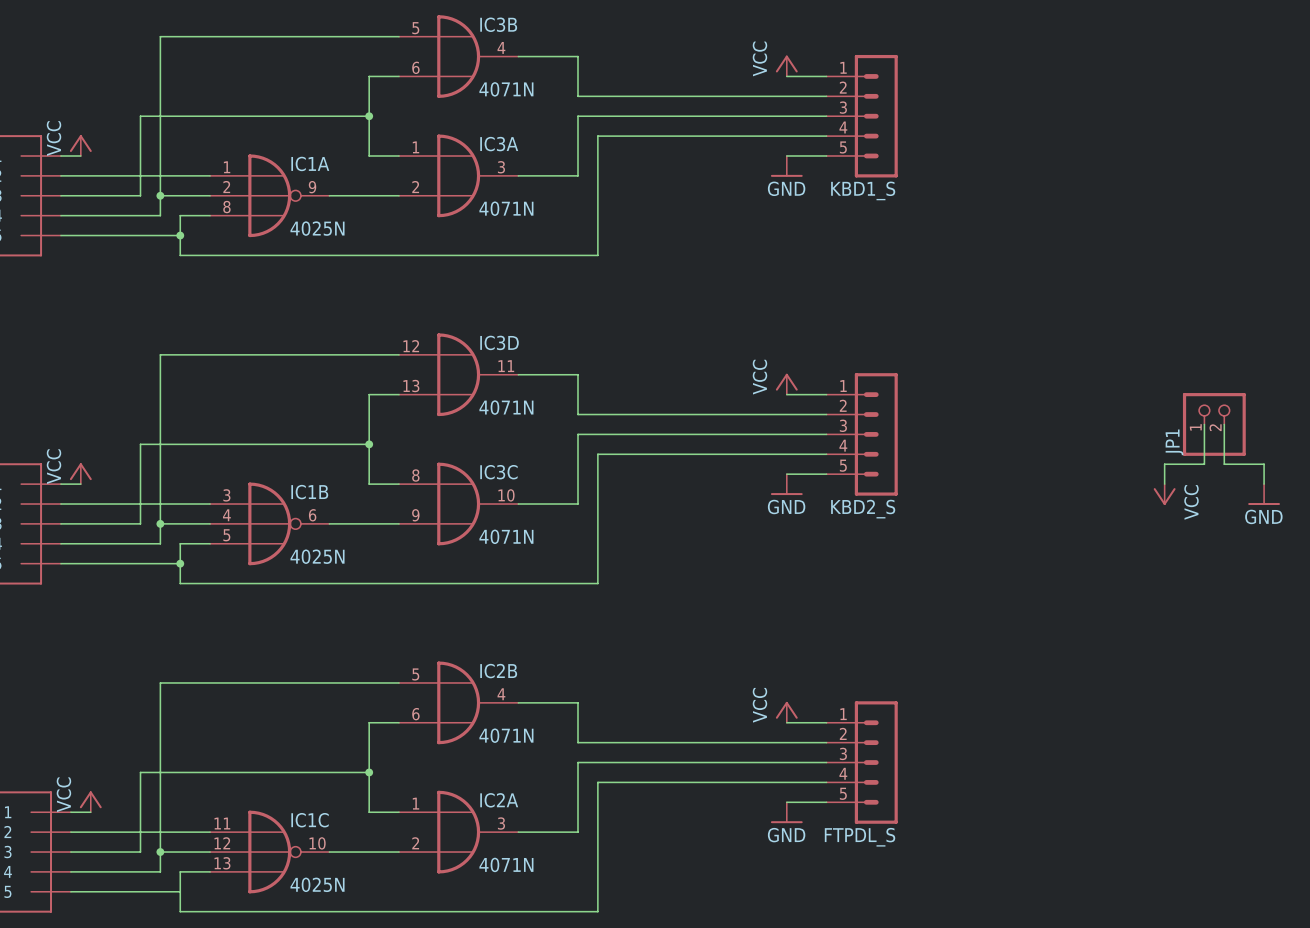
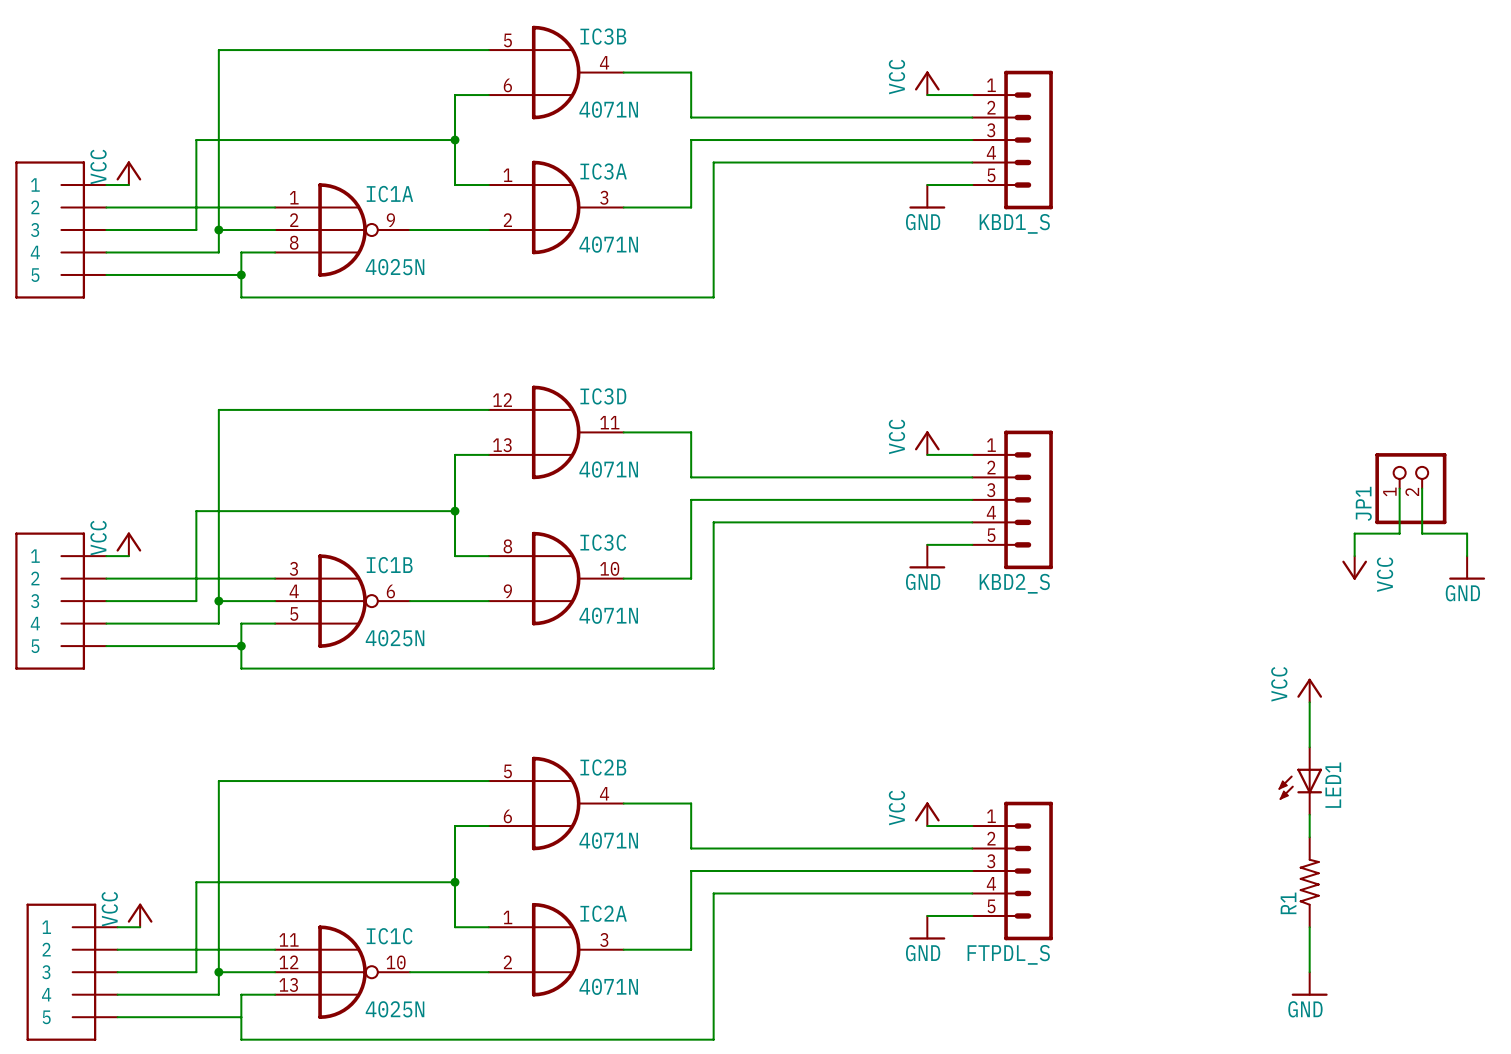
power symbol: none -> VCC (1309, 690)
wire: none -> (1309, 702) (1309, 747)
LED1: none -> (1300, 781)
wire: none -> (1309, 814) (1309, 837)
R1: none -> (1309, 882)
wire: none -> (1309, 927) (1309, 972)
power symbol: none -> GND (1309, 984)

